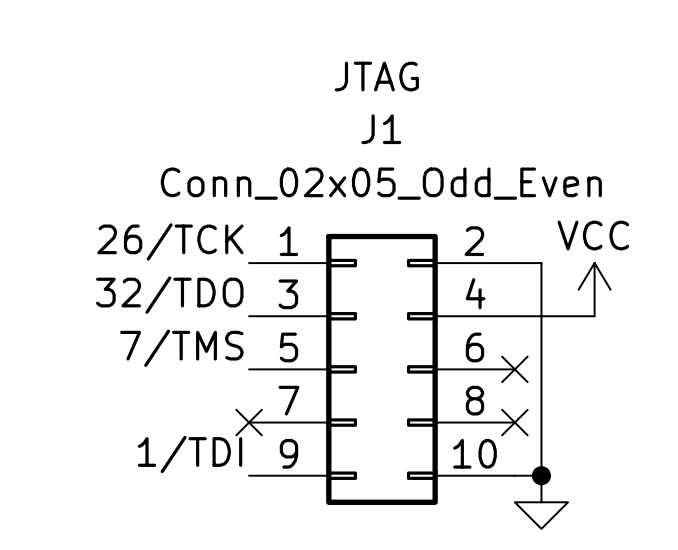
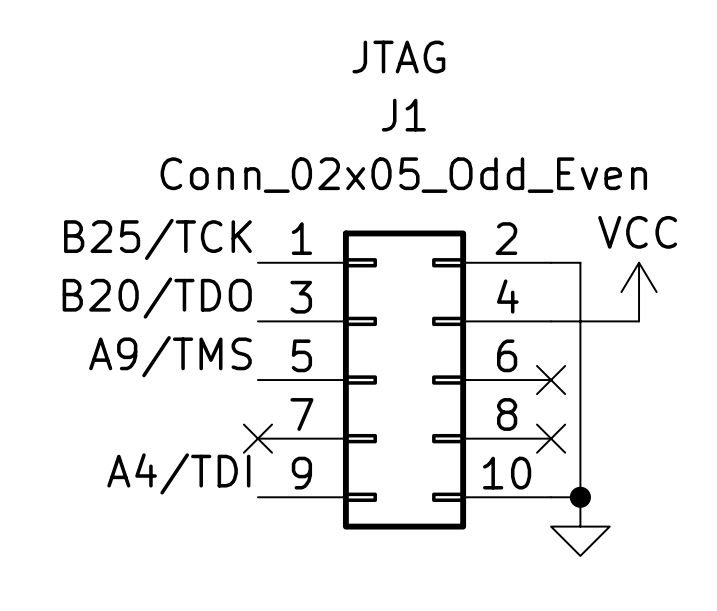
label: 26/TCK (170, 241) -> B25/TCK (157, 239)
label: 32/TDO (169, 295) -> B20/TDO (157, 298)
label: 7/TMS (181, 348) -> A9/TMS (170, 356)
label: 1/TDI (190, 454) -> A4/TDI (178, 473)

